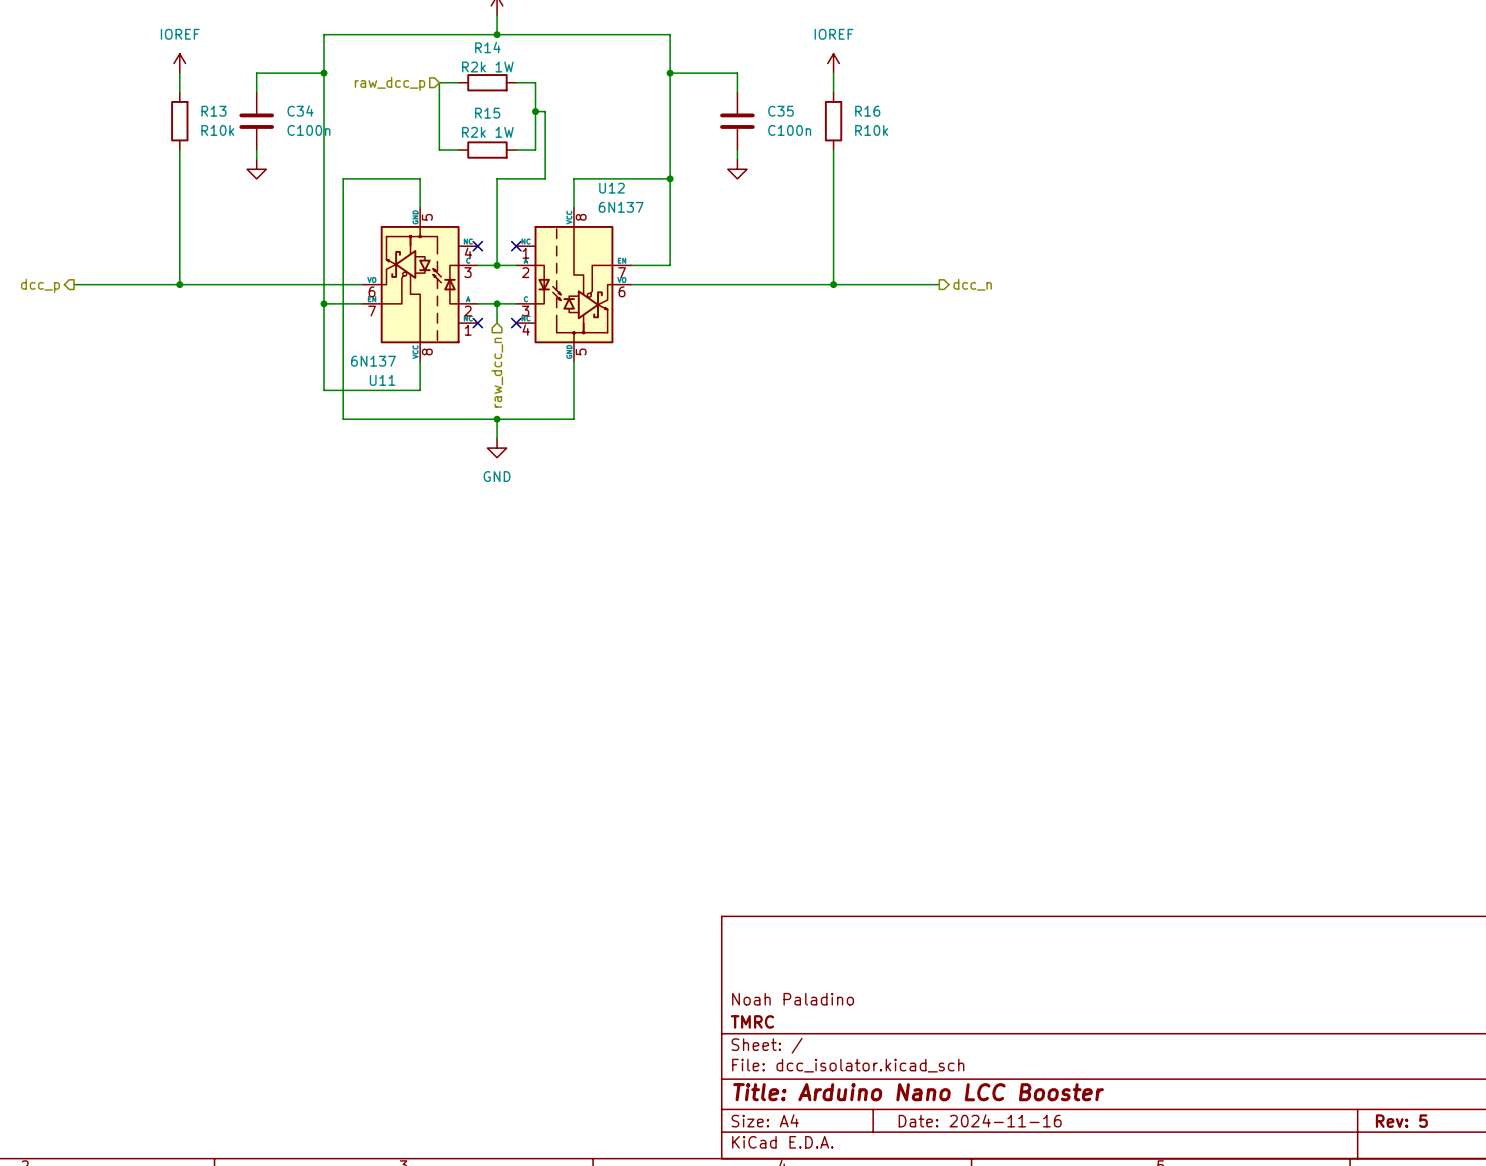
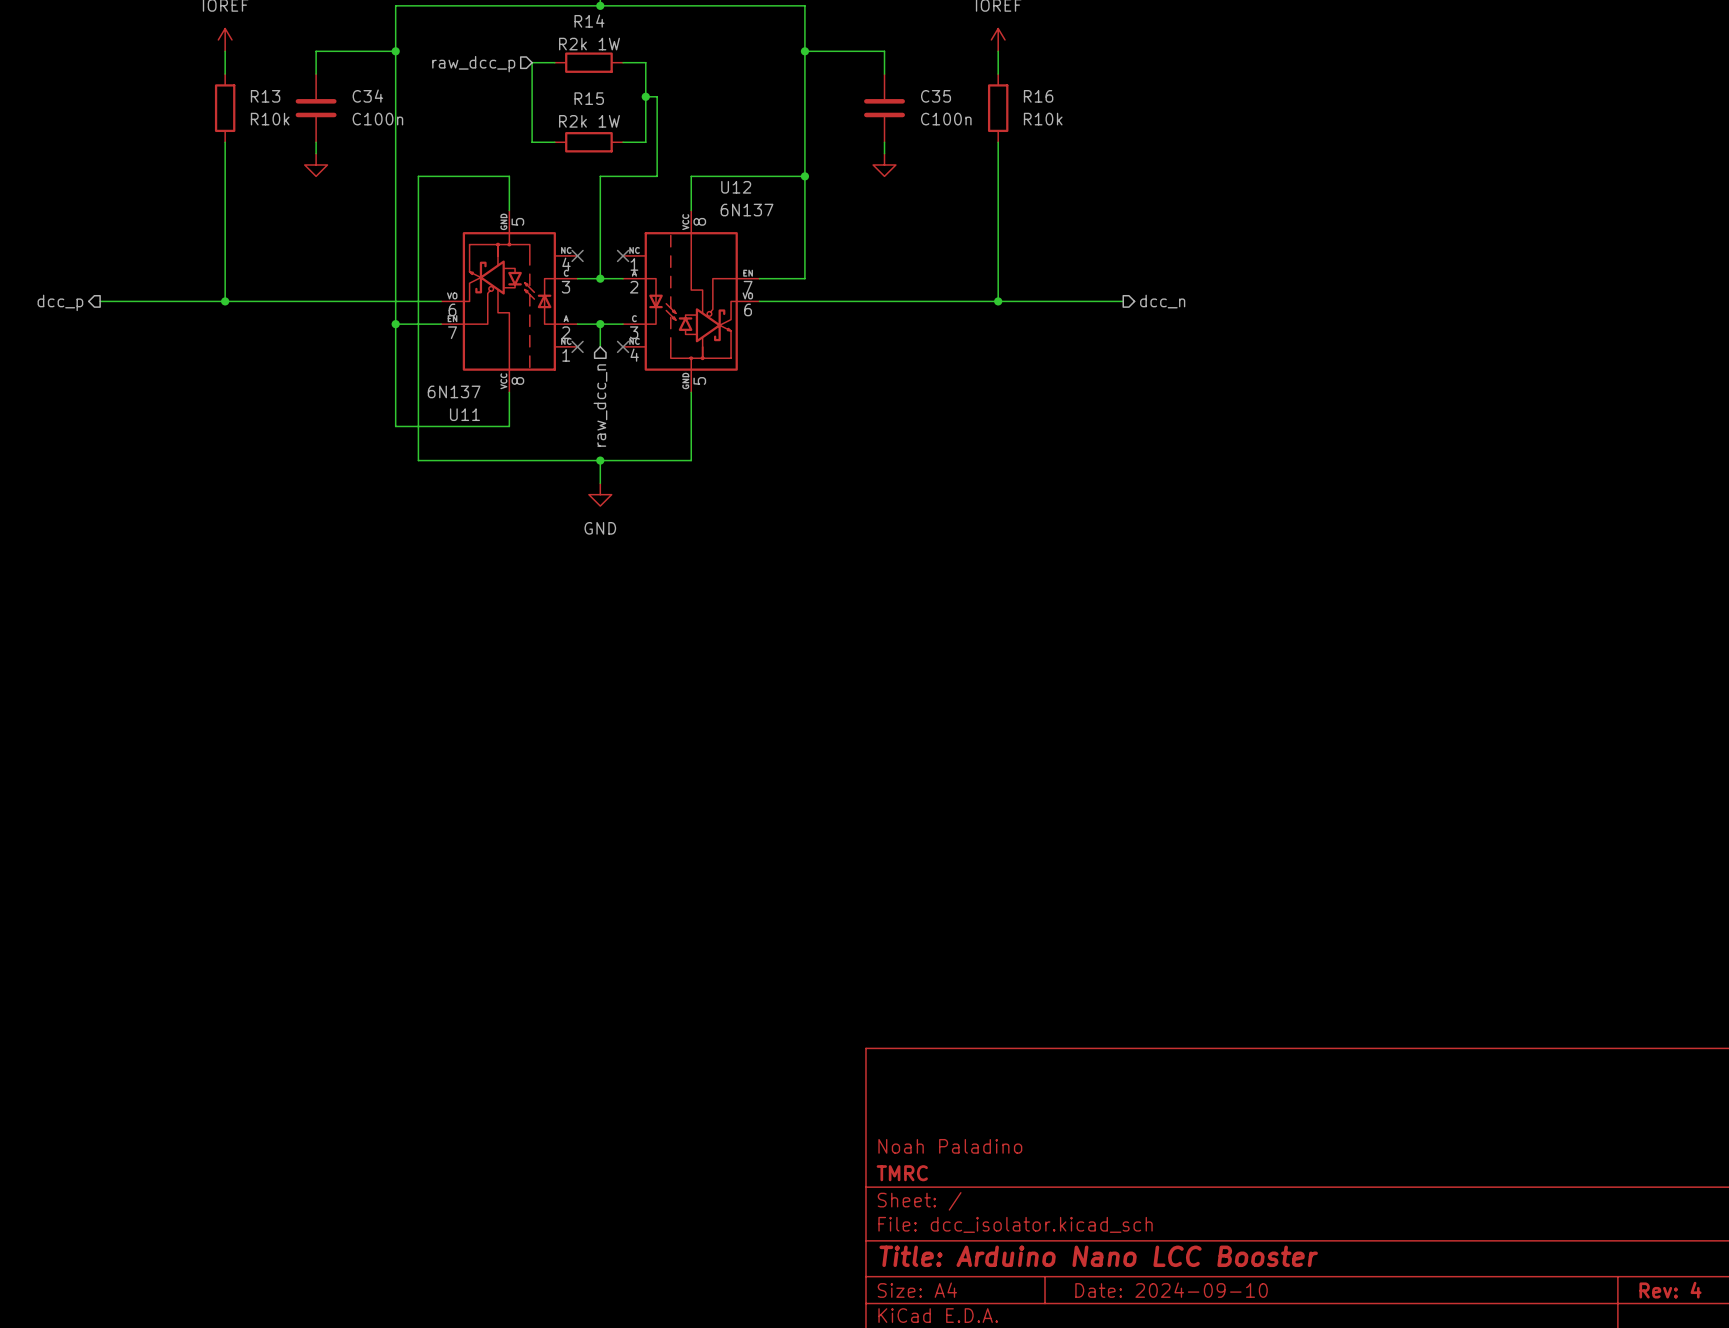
title block: Date: 2024-11-16 (980, 1120) -> Date: 2024-09-10 (1171, 1290)
title block: Rev: 5 (1401, 1121) -> Rev: 4 (1670, 1290)

